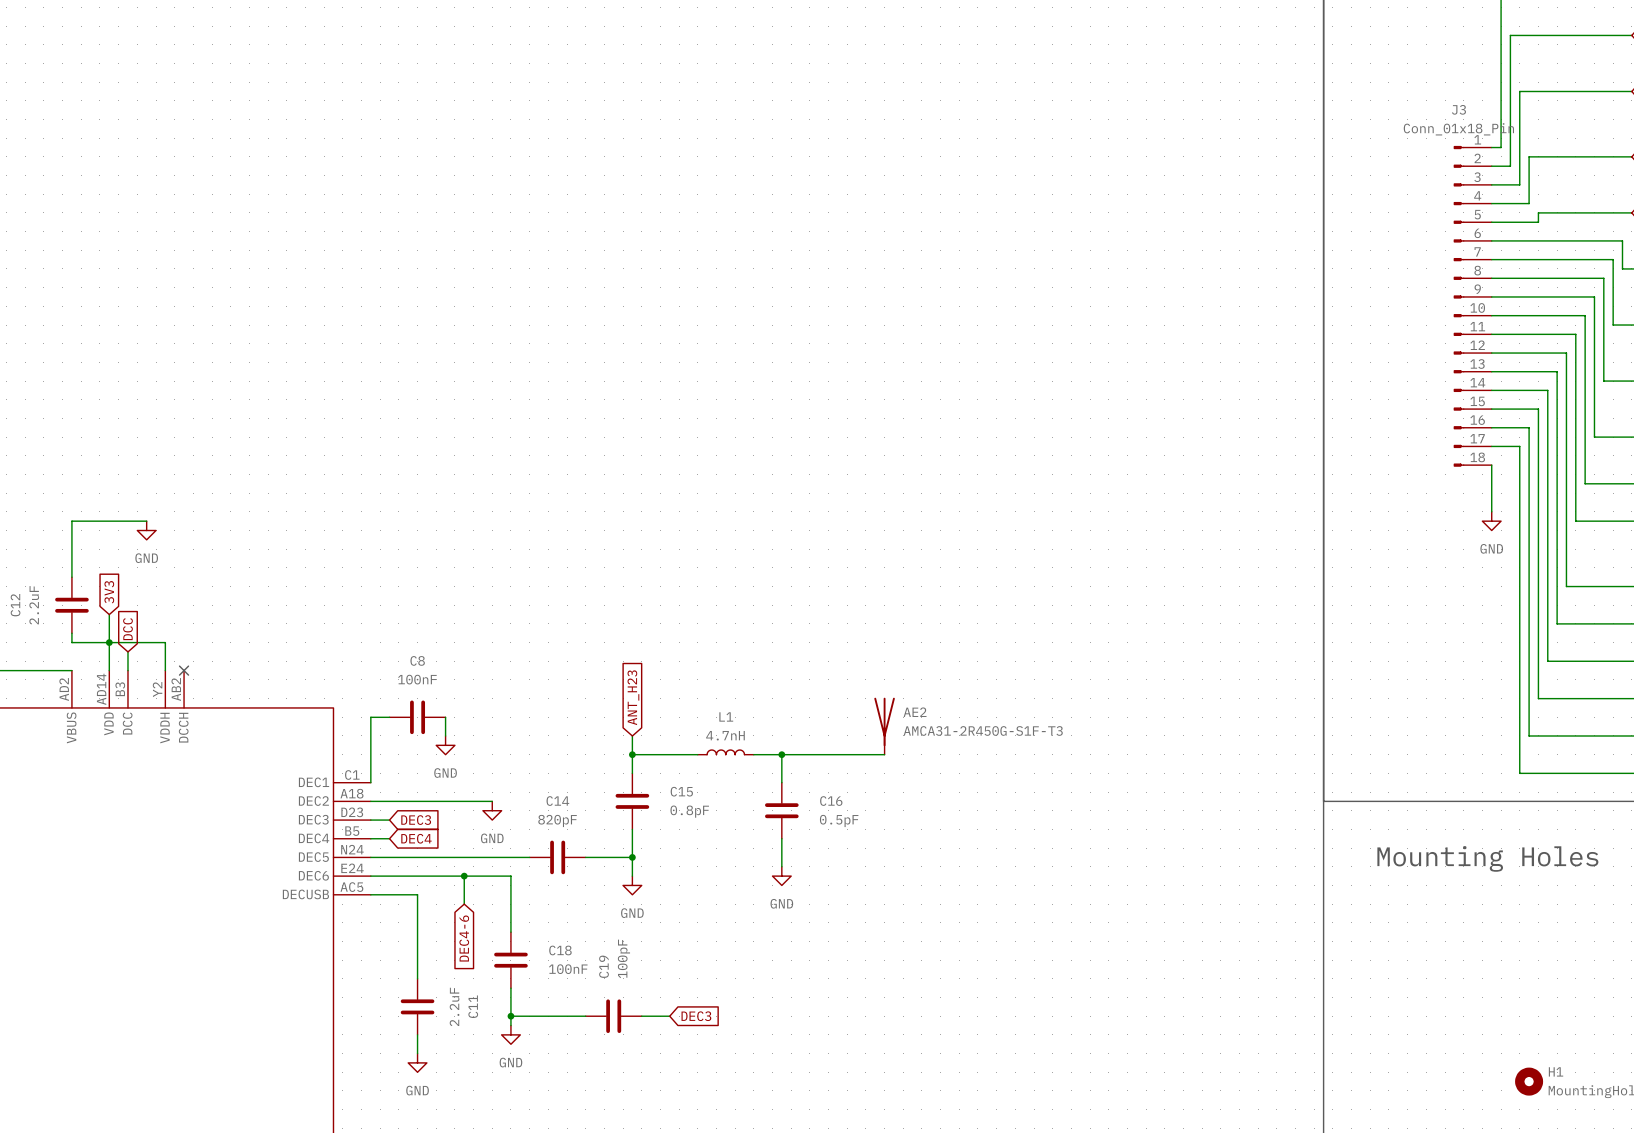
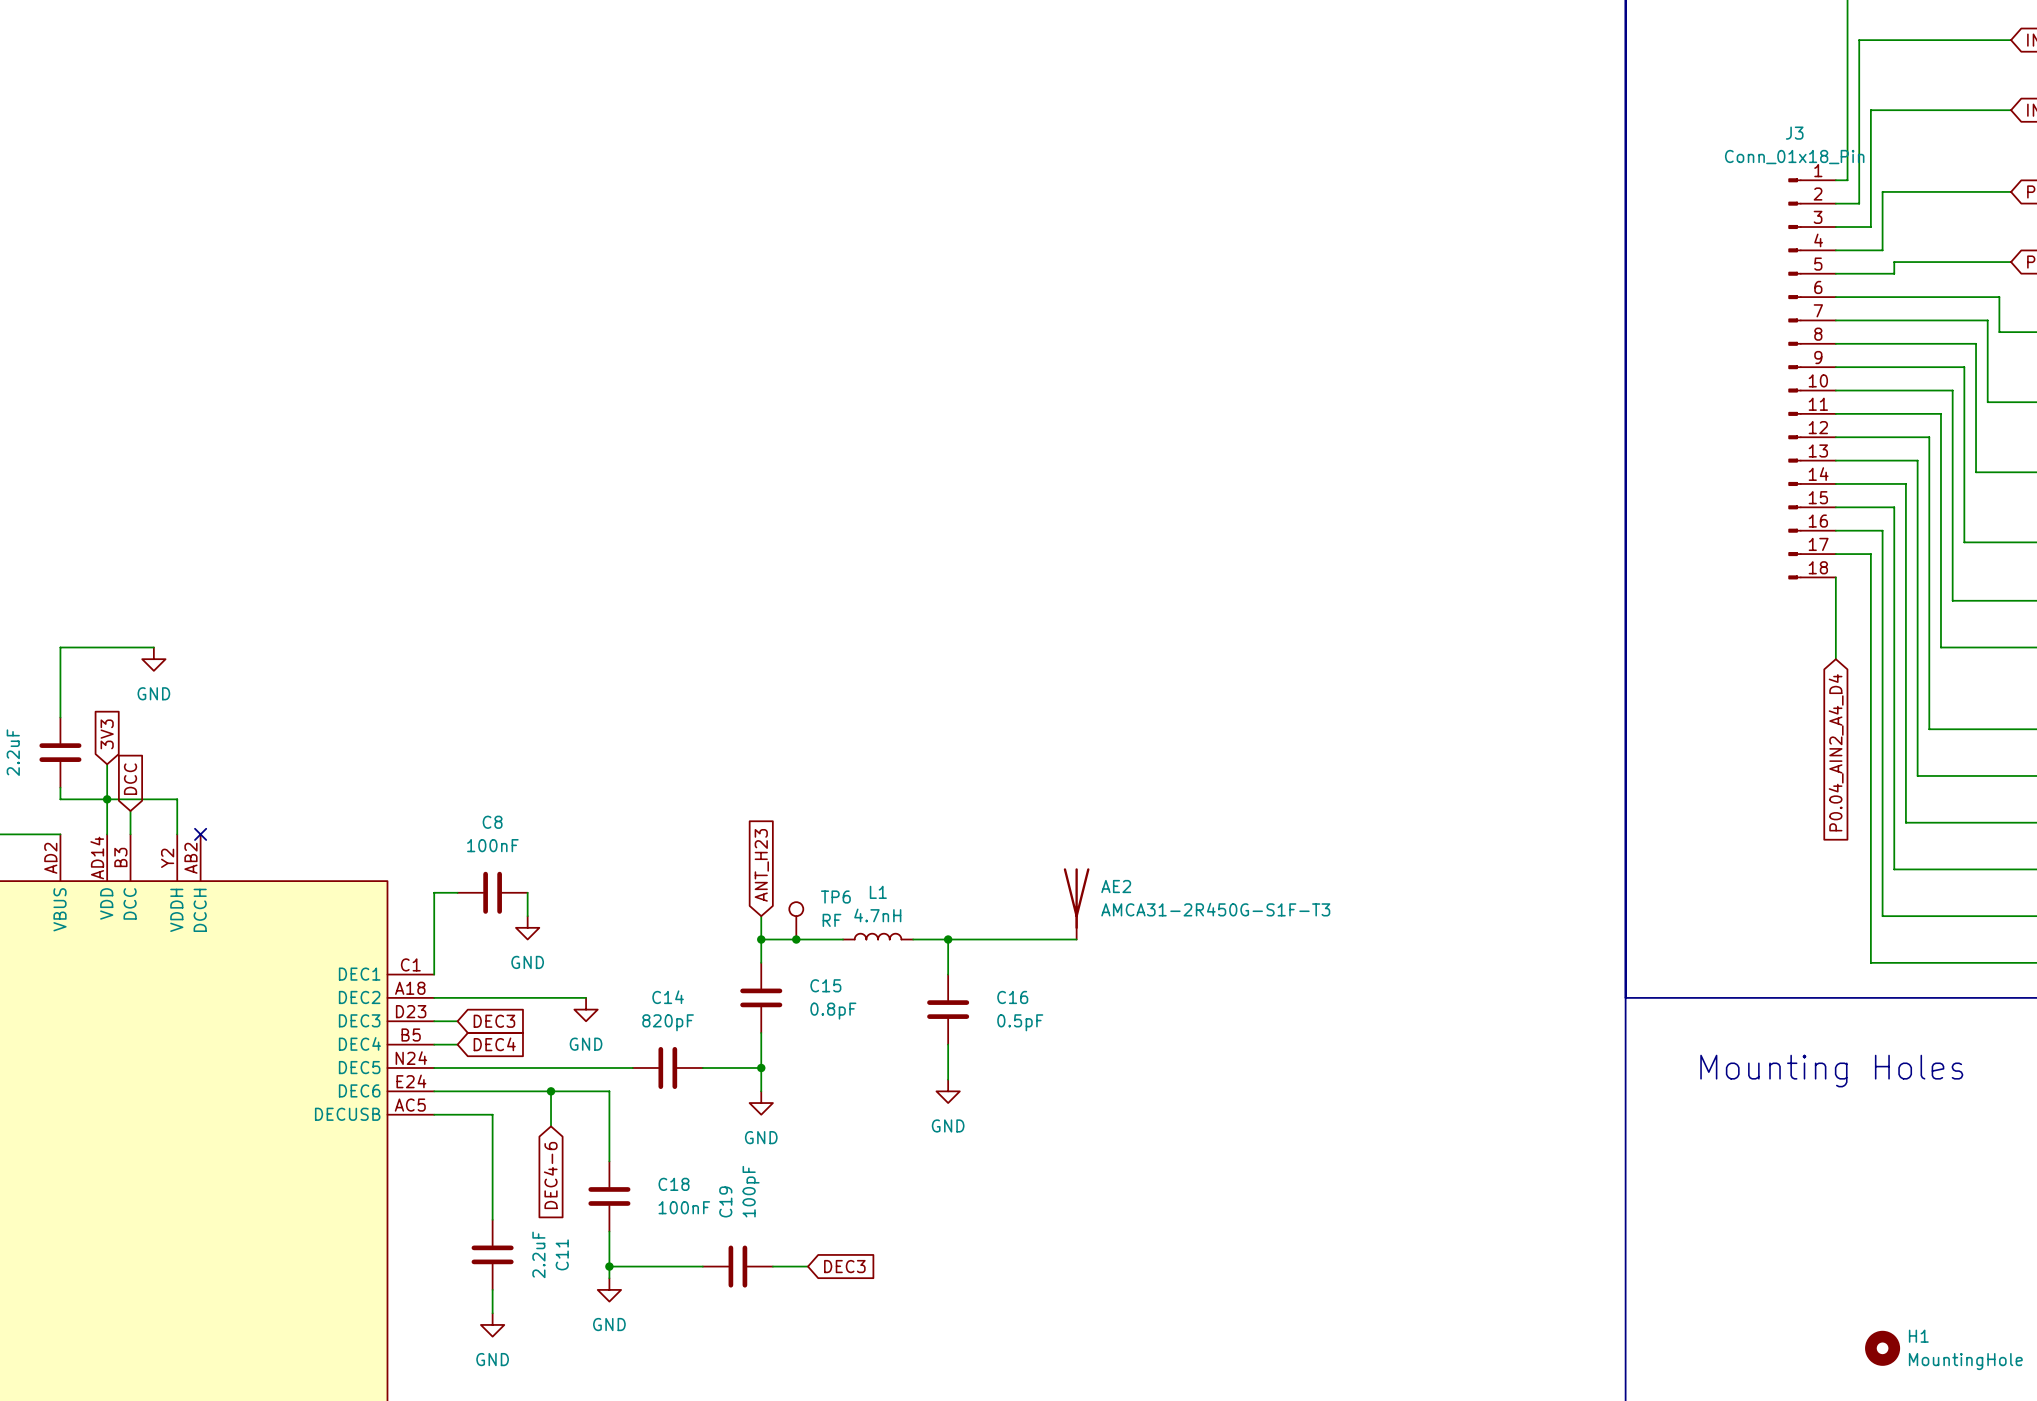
power symbol: GND (1491, 521) -> none
global label: none -> P0.04_AIN2_A4_D4 (1836, 752)
TP6: none -> RF (796, 920)
junction: none -> (796, 939)

